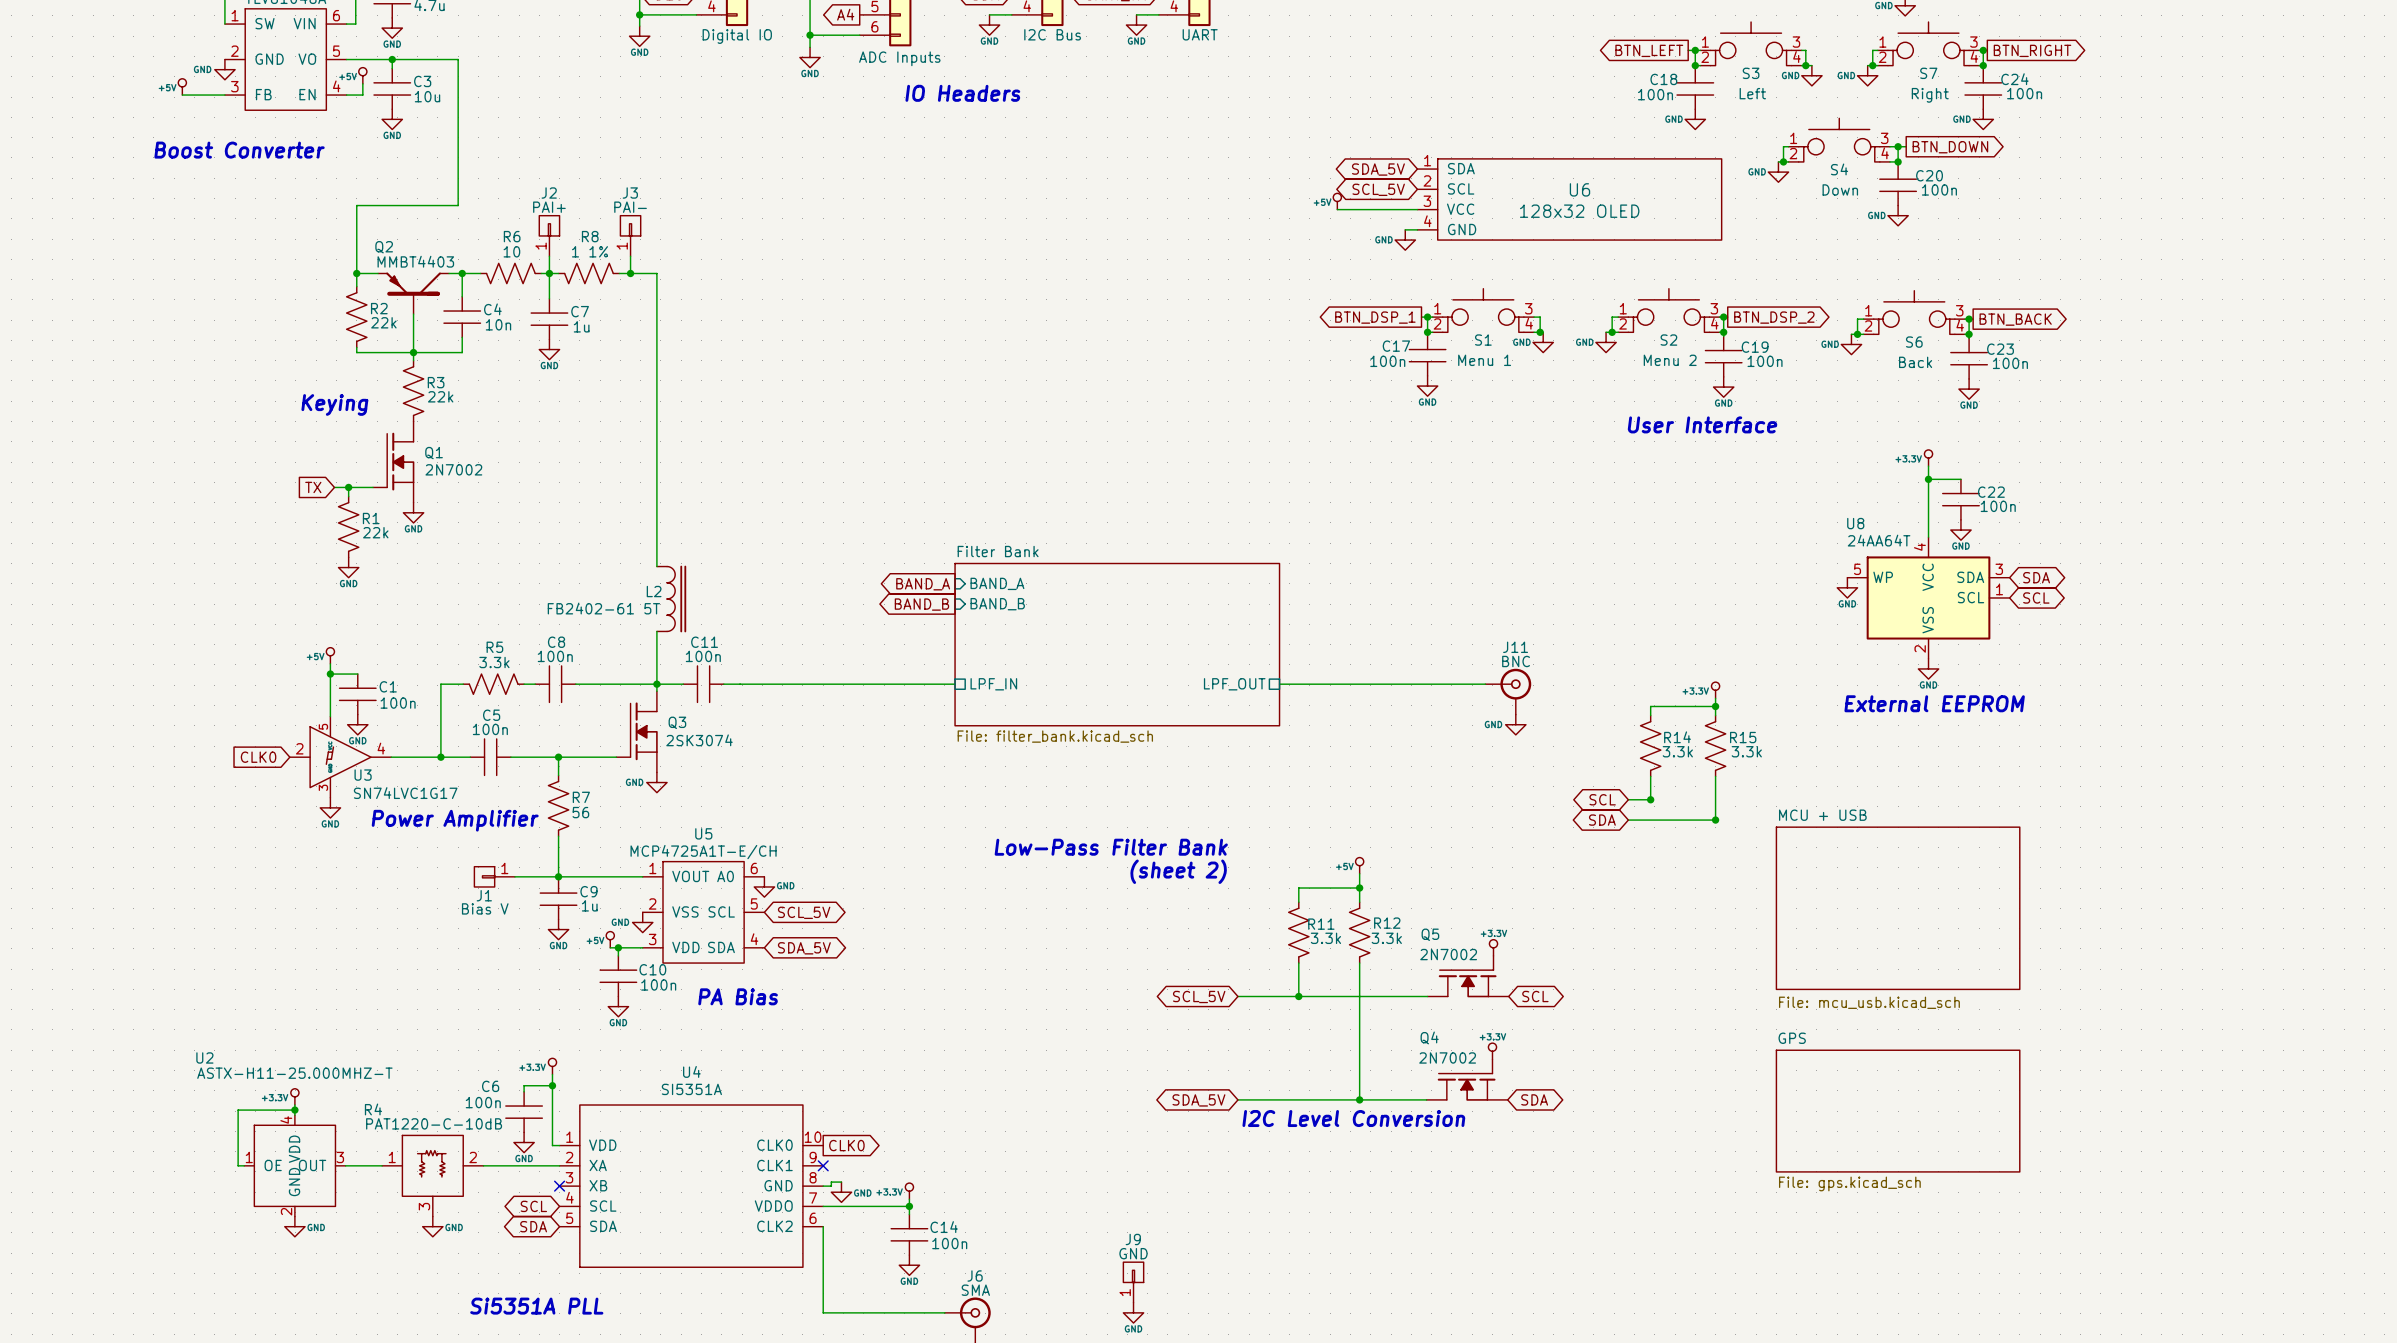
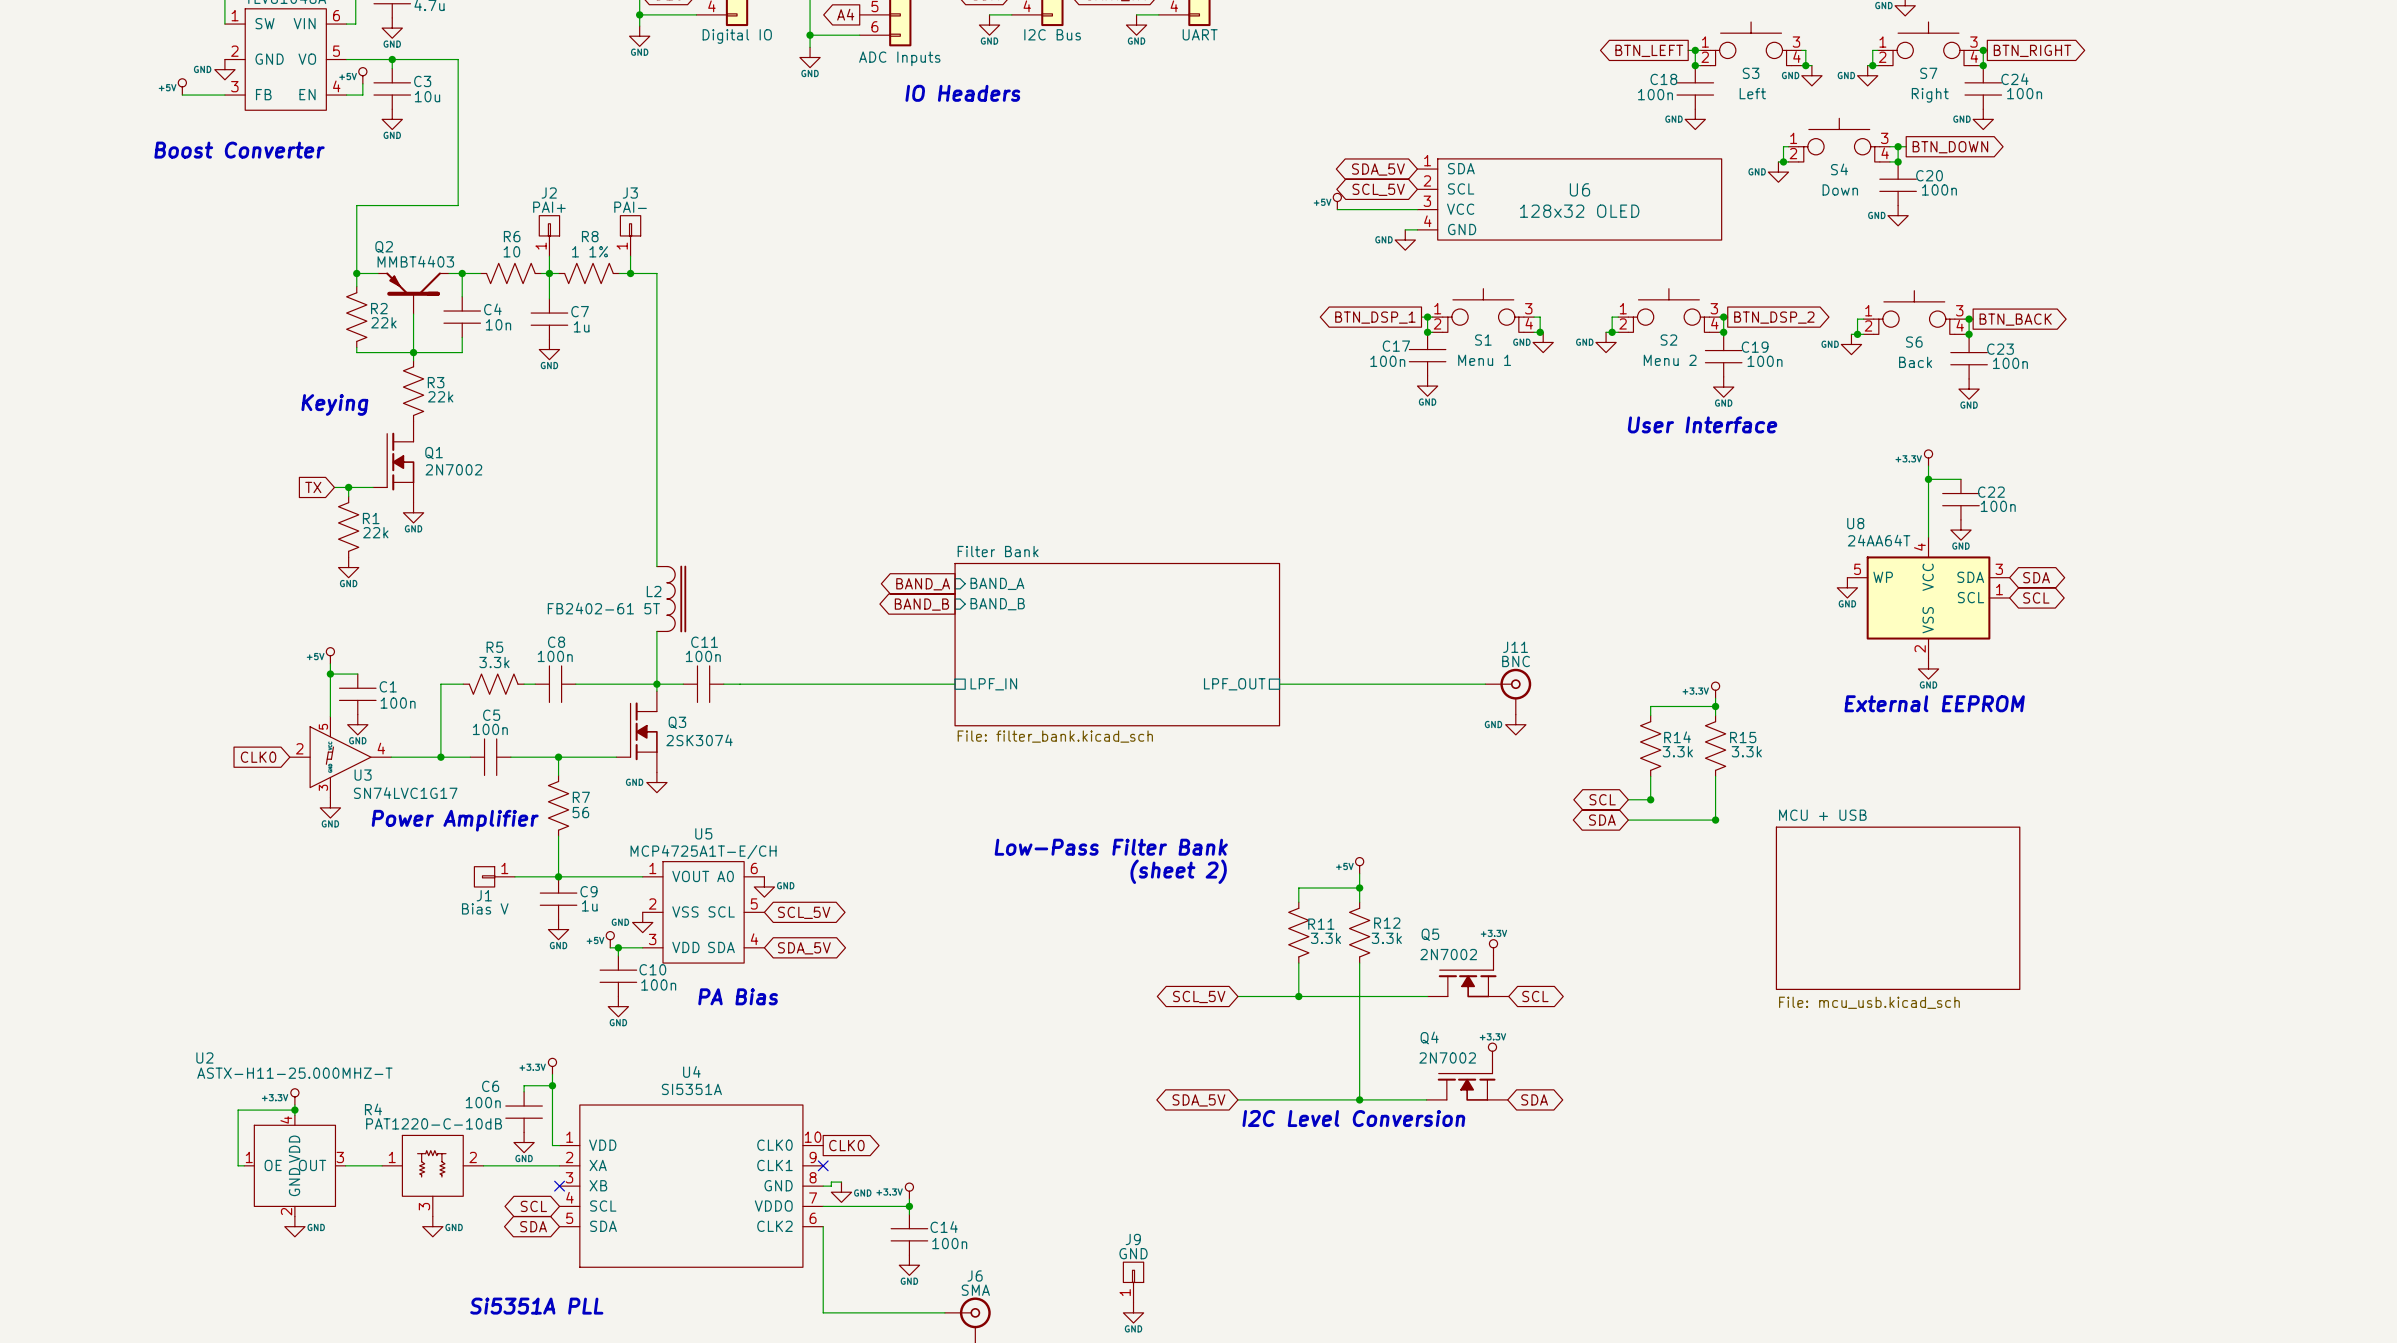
sheet GPS: File: gps.kicad_sch (1898, 1111) -> none

